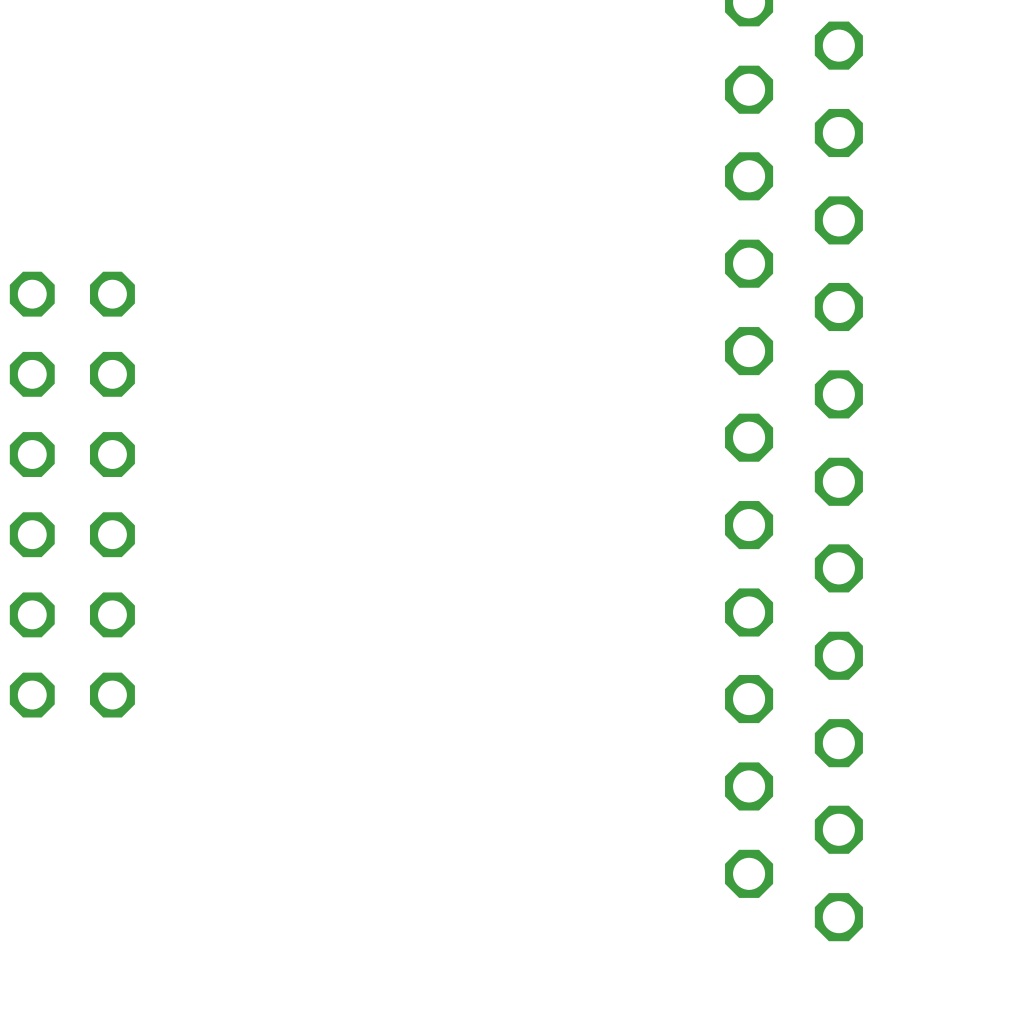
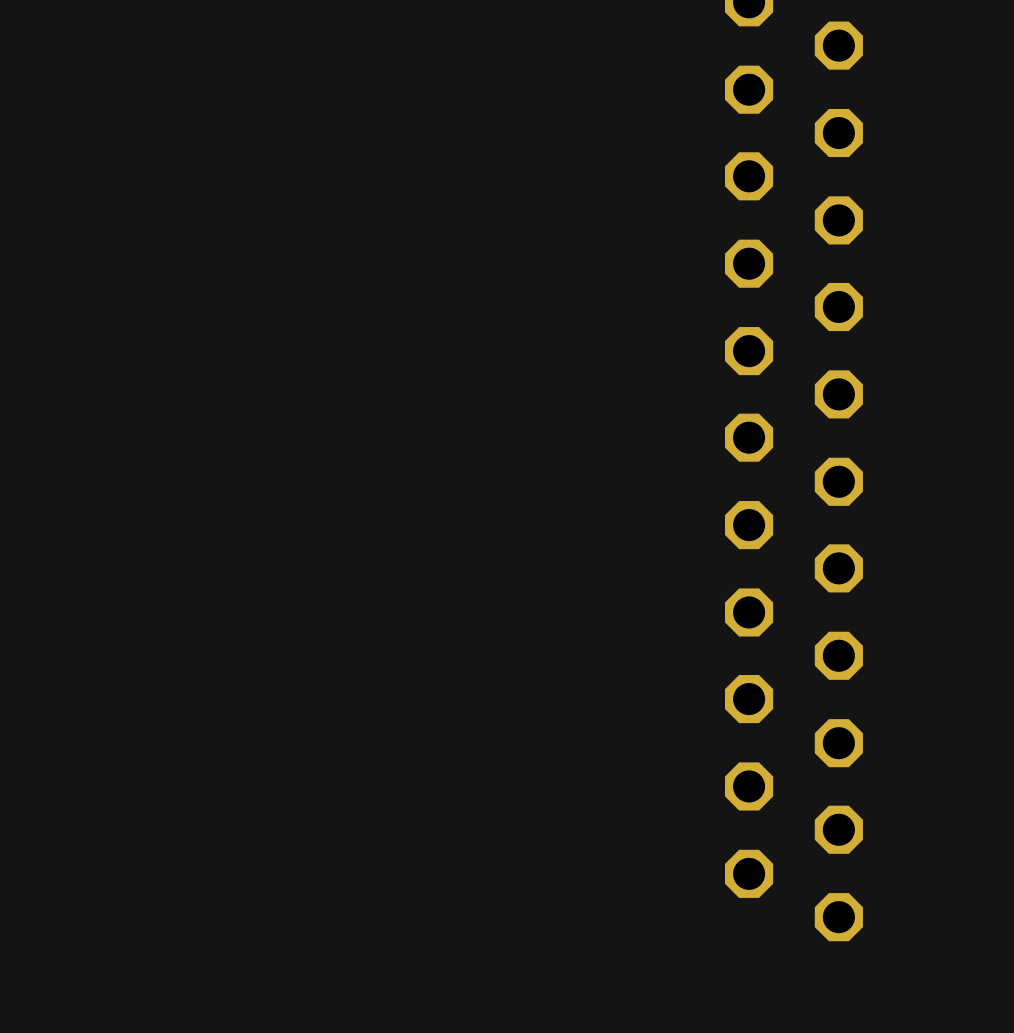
part: (72, 494) -> none

